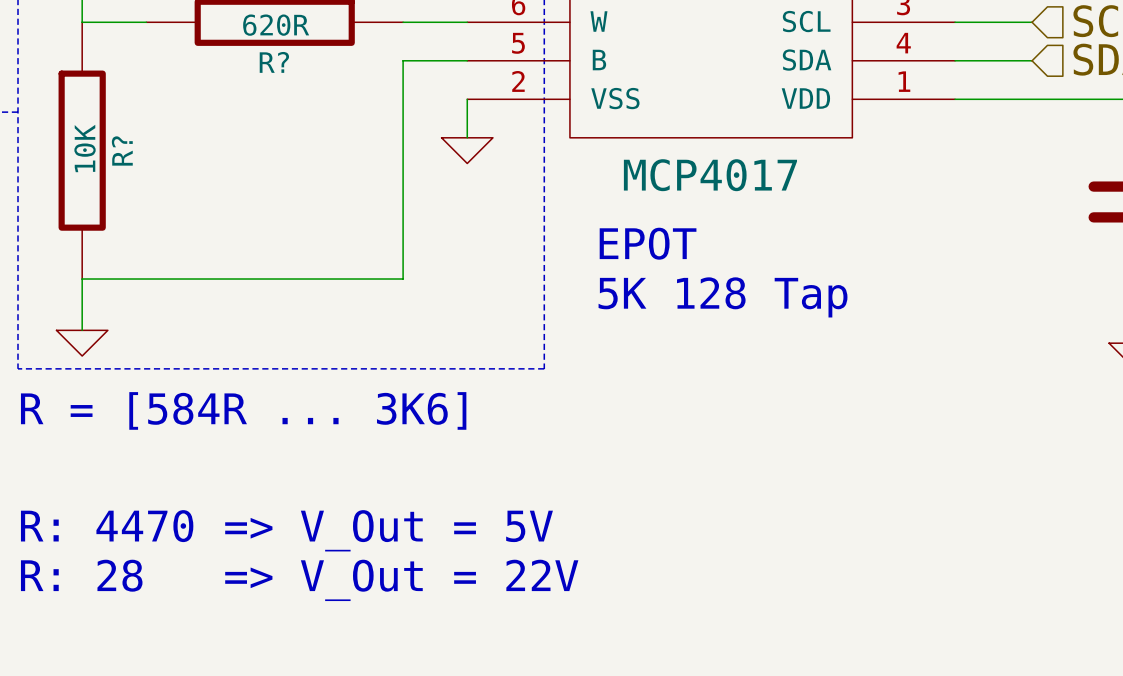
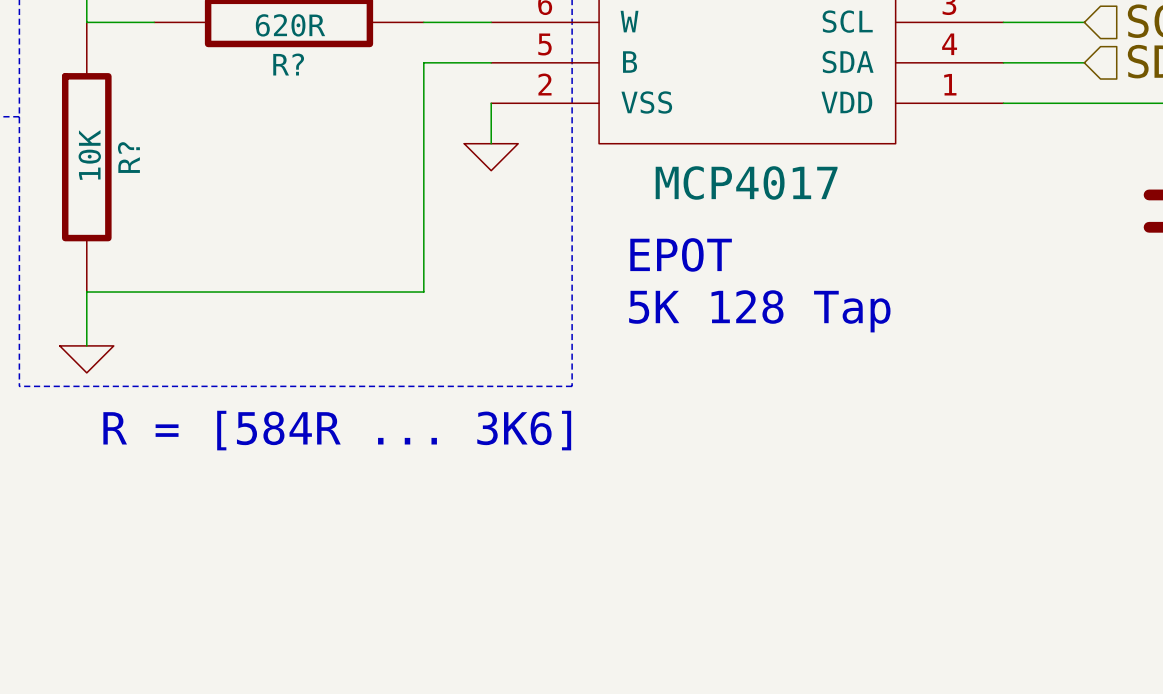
text position: R = [584R ... 3K6] (243, 410) -> R = [584R ... 3K6] (337, 430)
text: R: 4470 (107, 526) -> none
text: => V_Out = 5V (389, 530) -> none
text: R: 28 (81, 575) -> none
text: => V_Out = 22V (401, 580) -> none

